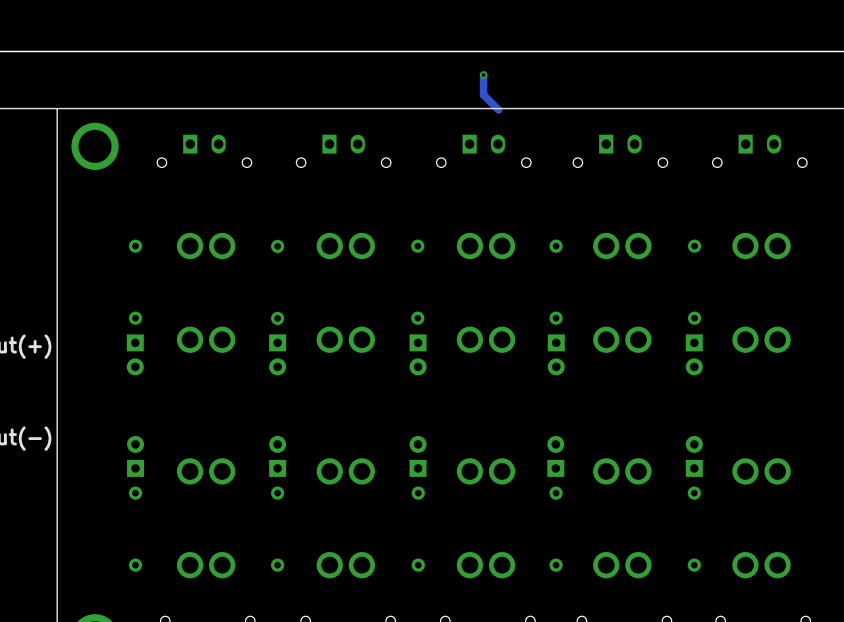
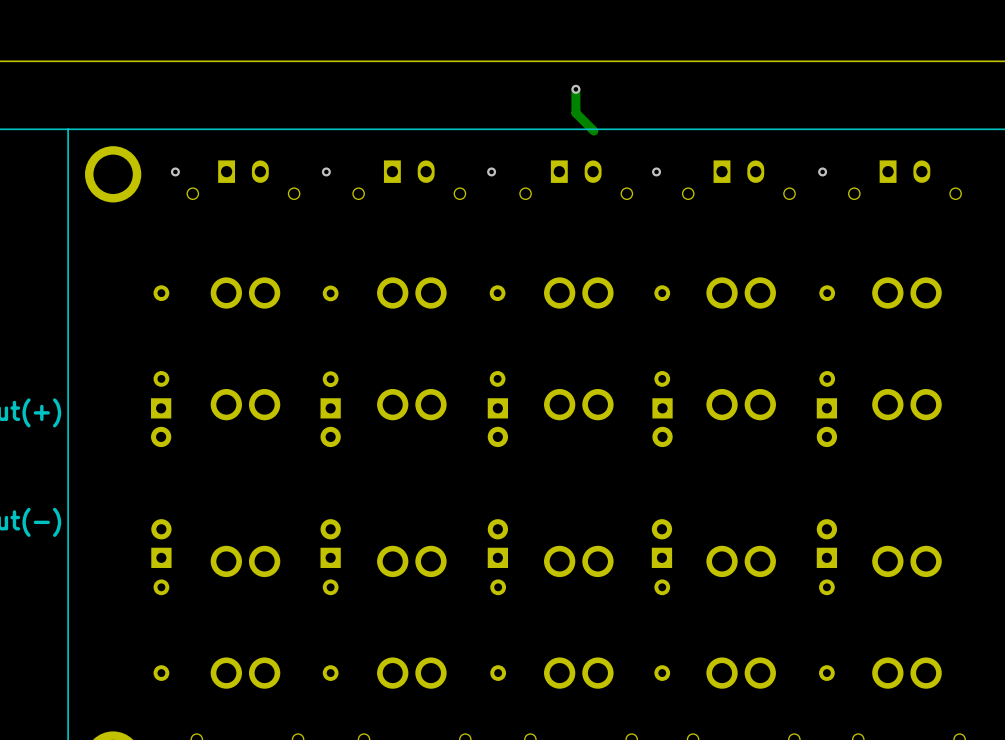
via: none -> (175, 171)
via: none -> (326, 171)
via: none -> (491, 171)
via: none -> (656, 171)
via: none -> (822, 171)

